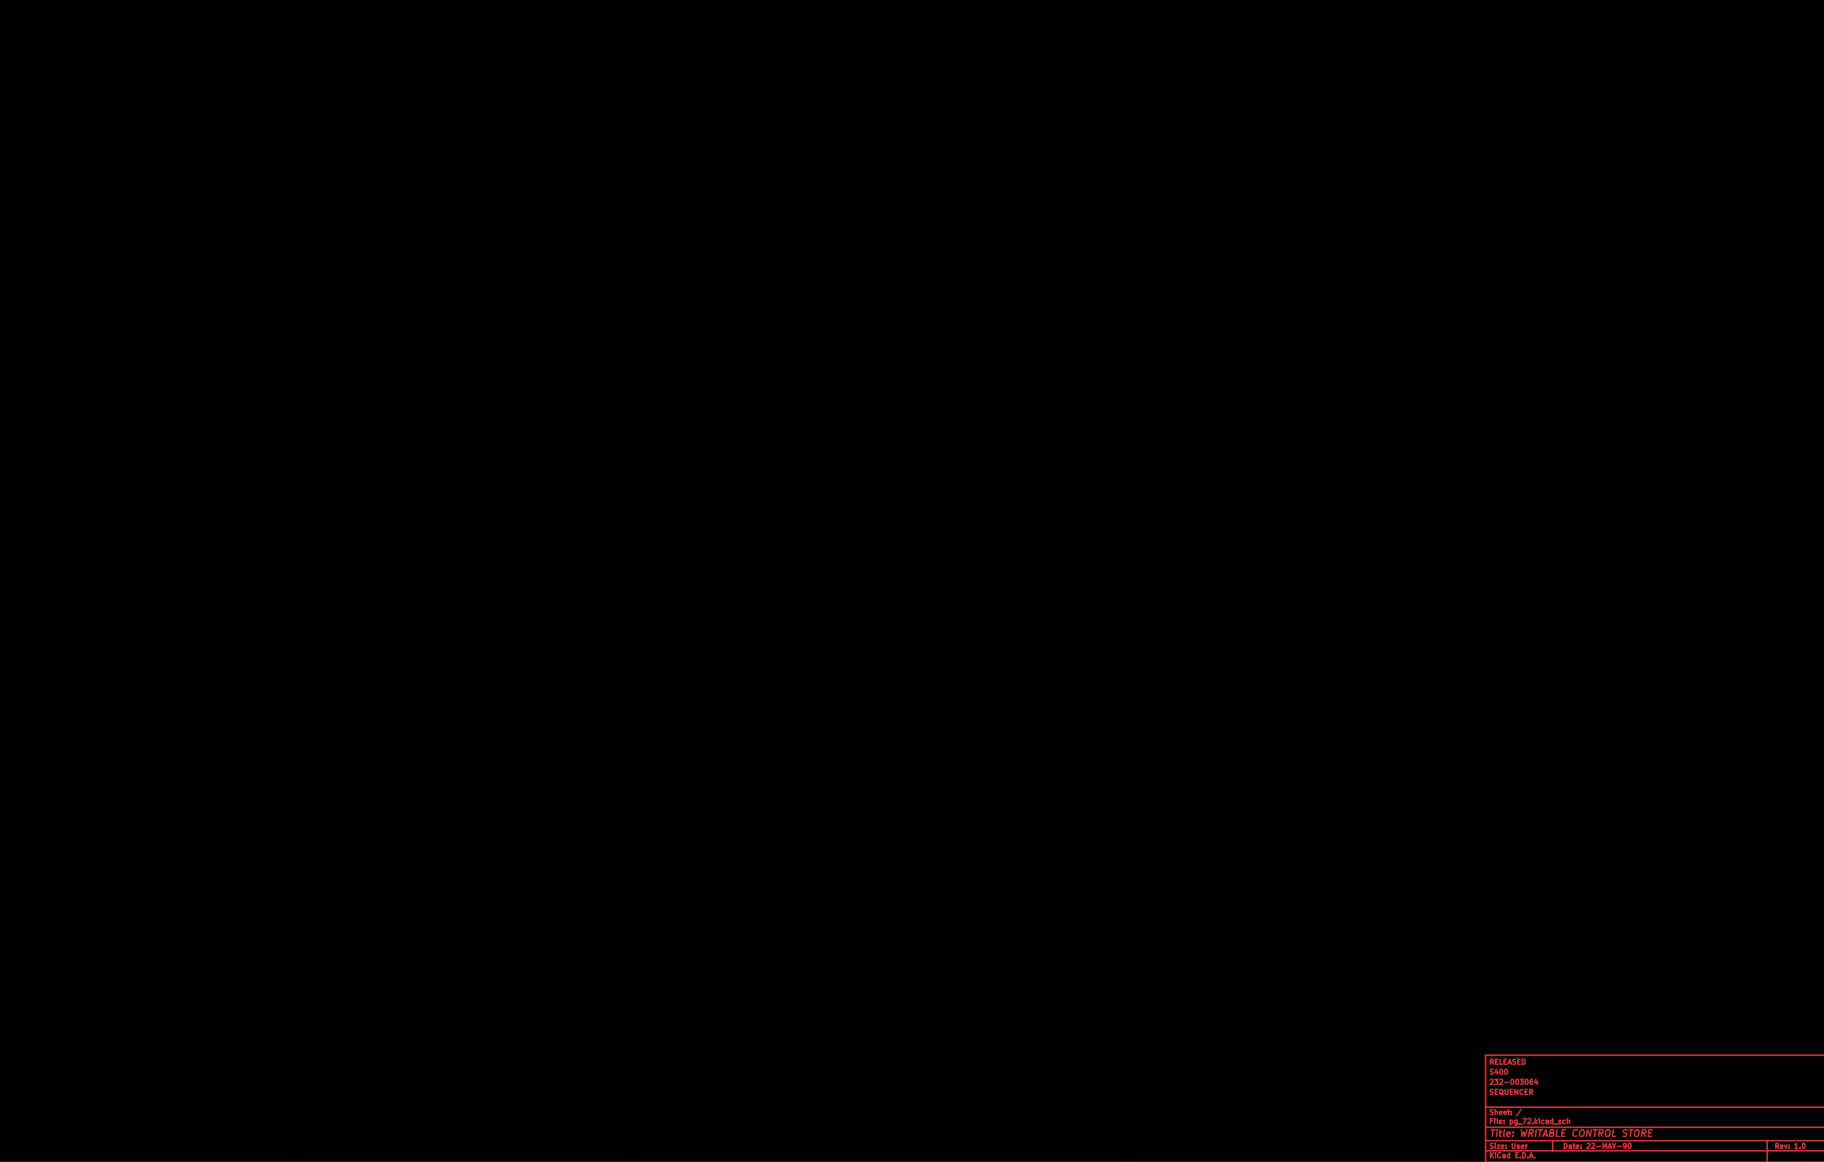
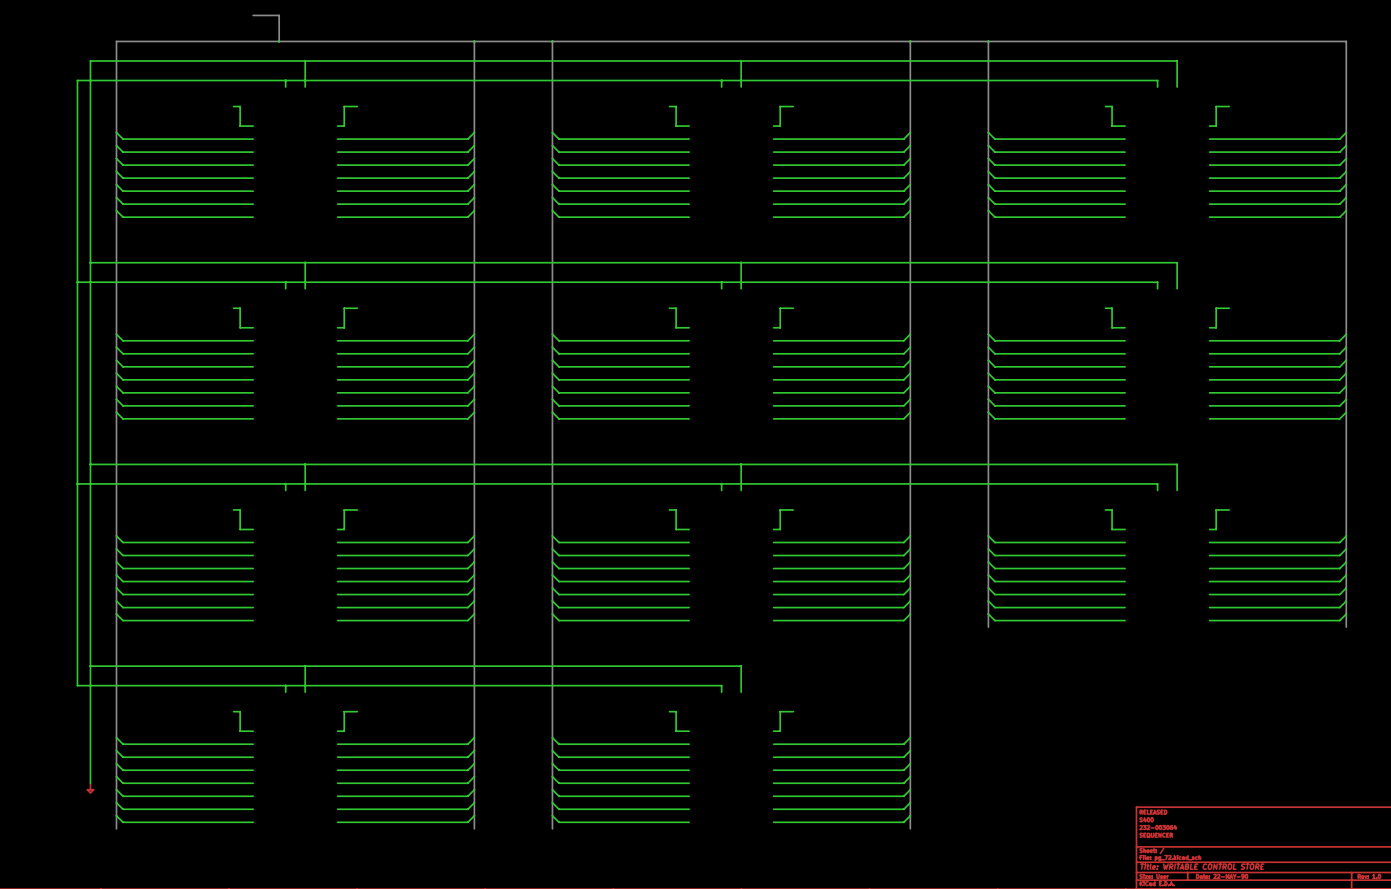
bus: none -> (253, 15) (279, 15) (279, 41)
junction: none -> (279, 41)
bus: none -> (474, 41) (474, 828)
junction: none -> (474, 41)
bus: none -> (552, 41) (552, 828)
junction: none -> (552, 41)
bus: none -> (910, 41) (910, 828)
junction: none -> (910, 41)
bus: none -> (988, 41) (988, 627)
junction: none -> (988, 41)
wire: none -> (305, 60) (305, 87)
wire: none -> (741, 60) (741, 87)
wire: none -> (285, 80) (285, 87)
wire: none -> (721, 80) (721, 87)
wire: none -> (1157, 87) (1157, 80) (77, 80) (77, 685) (721, 685) (721, 692)
wire: none -> (1177, 87) (1177, 60) (90, 60) (90, 783)
wire: none -> (233, 106) (240, 106) (240, 126) (253, 126)
wire: none -> (357, 106) (344, 106) (344, 126) (337, 126)
wire: none -> (669, 106) (676, 106) (676, 126) (689, 126)
wire: none -> (793, 106) (780, 106) (780, 126) (773, 126)
wire: none -> (1105, 106) (1112, 106) (1112, 126) (1125, 126)
wire: none -> (1229, 106) (1216, 106) (1216, 126) (1209, 126)
wire: none -> (116, 132) (123, 139) (253, 139)
wire: none -> (474, 132) (467, 139) (337, 139)
wire: none -> (552, 132) (558, 139) (689, 139)
wire: none -> (910, 132) (903, 139) (773, 139)
wire: none -> (988, 132) (994, 139) (1125, 139)
wire: none -> (1346, 132) (1339, 139) (1209, 139)
wire: none -> (116, 145) (123, 152) (253, 152)
wire: none -> (474, 145) (467, 152) (337, 152)
wire: none -> (552, 145) (558, 152) (689, 152)
wire: none -> (910, 145) (903, 152) (773, 152)
wire: none -> (988, 145) (994, 152) (1125, 152)
wire: none -> (1346, 145) (1339, 152) (1209, 152)
wire: none -> (116, 158) (123, 165) (253, 165)
wire: none -> (474, 158) (467, 165) (337, 165)
wire: none -> (552, 158) (558, 165) (689, 165)
wire: none -> (910, 158) (903, 165) (773, 165)
wire: none -> (988, 158) (994, 165) (1125, 165)
wire: none -> (1346, 158) (1339, 165) (1209, 165)
wire: none -> (116, 171) (123, 178) (253, 178)
wire: none -> (474, 171) (467, 178) (337, 178)
wire: none -> (552, 171) (558, 178) (689, 178)
wire: none -> (910, 171) (903, 178) (773, 178)
wire: none -> (988, 171) (994, 178) (1125, 178)
wire: none -> (1346, 171) (1339, 178) (1209, 178)
wire: none -> (116, 184) (123, 191) (253, 191)
wire: none -> (474, 184) (467, 191) (337, 191)
wire: none -> (552, 184) (558, 191) (689, 191)
wire: none -> (910, 184) (903, 191) (773, 191)
wire: none -> (988, 184) (994, 191) (1125, 191)
wire: none -> (1346, 184) (1339, 191) (1209, 191)
wire: none -> (116, 197) (123, 204) (253, 204)
wire: none -> (474, 197) (467, 204) (337, 204)
wire: none -> (552, 197) (558, 204) (689, 204)
wire: none -> (910, 197) (903, 204) (773, 204)
wire: none -> (988, 197) (994, 204) (1125, 204)
wire: none -> (1346, 197) (1339, 204) (1209, 204)
wire: none -> (116, 210) (123, 217) (253, 217)
wire: none -> (474, 210) (467, 217) (337, 217)
wire: none -> (552, 210) (558, 217) (689, 217)
wire: none -> (910, 210) (903, 217) (773, 217)
wire: none -> (988, 210) (994, 217) (1125, 217)
wire: none -> (1346, 210) (1339, 217) (1209, 217)
wire: none -> (90, 262) (1177, 262) (1177, 288)
wire: none -> (305, 262) (305, 288)
wire: none -> (741, 262) (741, 288)
wire: none -> (77, 282) (1157, 282) (1157, 288)
wire: none -> (285, 282) (285, 288)
wire: none -> (721, 282) (721, 288)
wire: none -> (233, 308) (240, 308) (240, 327) (253, 327)
wire: none -> (357, 308) (344, 308) (344, 327) (337, 327)
wire: none -> (669, 308) (676, 308) (676, 327) (689, 327)
wire: none -> (793, 308) (780, 308) (780, 327) (773, 327)
wire: none -> (1105, 308) (1112, 308) (1112, 327) (1125, 327)
wire: none -> (1229, 308) (1216, 308) (1216, 327) (1209, 327)
wire: none -> (116, 334) (123, 340) (253, 340)
wire: none -> (474, 334) (467, 340) (337, 340)
wire: none -> (552, 334) (558, 340) (689, 340)
wire: none -> (910, 334) (903, 340) (773, 340)
wire: none -> (988, 334) (994, 340) (1125, 340)
wire: none -> (1346, 334) (1339, 340) (1209, 340)
wire: none -> (116, 347) (123, 353) (253, 353)
wire: none -> (474, 347) (467, 353) (337, 353)
wire: none -> (552, 347) (558, 353) (689, 353)
wire: none -> (910, 347) (903, 353) (773, 353)
wire: none -> (988, 347) (994, 353) (1125, 353)
wire: none -> (1346, 347) (1339, 353) (1209, 353)
wire: none -> (116, 360) (123, 366) (253, 366)
wire: none -> (474, 360) (467, 366) (337, 366)
wire: none -> (552, 360) (558, 366) (689, 366)
wire: none -> (910, 360) (903, 366) (773, 366)
wire: none -> (988, 360) (994, 366) (1125, 366)
wire: none -> (1346, 360) (1339, 366) (1209, 366)
wire: none -> (116, 373) (123, 379) (253, 379)
wire: none -> (474, 373) (467, 379) (337, 379)
wire: none -> (552, 373) (558, 379) (689, 379)
wire: none -> (910, 373) (903, 379) (773, 379)
wire: none -> (988, 373) (994, 379) (1125, 379)
wire: none -> (1346, 373) (1339, 379) (1209, 379)
wire: none -> (116, 386) (123, 392) (253, 392)
wire: none -> (474, 386) (467, 392) (337, 392)
wire: none -> (552, 386) (558, 392) (689, 392)
wire: none -> (910, 386) (903, 392) (773, 392)
wire: none -> (988, 386) (994, 392) (1125, 392)
wire: none -> (1346, 386) (1339, 392) (1209, 392)
wire: none -> (116, 399) (123, 405) (253, 405)
wire: none -> (474, 399) (467, 405) (337, 405)
wire: none -> (552, 399) (558, 405) (689, 405)
wire: none -> (910, 399) (903, 405) (773, 405)
wire: none -> (988, 399) (994, 405) (1125, 405)
wire: none -> (1346, 399) (1339, 405) (1209, 405)
wire: none -> (116, 412) (123, 418) (253, 418)
wire: none -> (474, 412) (467, 418) (337, 418)
wire: none -> (552, 412) (558, 418) (689, 418)
wire: none -> (910, 412) (903, 418) (773, 418)
wire: none -> (988, 412) (994, 418) (1125, 418)
wire: none -> (1346, 412) (1339, 418) (1209, 418)
wire: none -> (90, 464) (1177, 464) (1177, 490)
wire: none -> (305, 464) (305, 490)
wire: none -> (741, 464) (741, 490)
wire: none -> (77, 483) (1157, 483) (1157, 490)
wire: none -> (285, 483) (285, 490)
wire: none -> (721, 483) (721, 490)
wire: none -> (233, 509) (240, 509) (240, 529) (253, 529)
wire: none -> (357, 509) (344, 509) (344, 529) (337, 529)
wire: none -> (669, 509) (676, 509) (676, 529) (689, 529)
wire: none -> (793, 509) (780, 509) (780, 529) (773, 529)
wire: none -> (1105, 509) (1112, 509) (1112, 529) (1125, 529)
wire: none -> (1229, 509) (1216, 509) (1216, 529) (1209, 529)
wire: none -> (116, 535) (123, 542) (253, 542)
wire: none -> (474, 535) (467, 542) (337, 542)
wire: none -> (552, 535) (558, 542) (689, 542)
wire: none -> (910, 535) (903, 542) (773, 542)
wire: none -> (988, 535) (994, 542) (1125, 542)
wire: none -> (1346, 535) (1339, 542) (1209, 542)
wire: none -> (116, 549) (123, 555) (253, 555)
wire: none -> (474, 549) (467, 555) (337, 555)
wire: none -> (552, 549) (558, 555) (689, 555)
wire: none -> (910, 549) (903, 555) (773, 555)
wire: none -> (988, 549) (994, 555) (1125, 555)
wire: none -> (1346, 549) (1339, 555) (1209, 555)
wire: none -> (116, 562) (123, 568) (253, 568)
wire: none -> (474, 562) (467, 568) (337, 568)
wire: none -> (552, 562) (558, 568) (689, 568)
wire: none -> (910, 562) (903, 568) (773, 568)
wire: none -> (988, 562) (994, 568) (1125, 568)
wire: none -> (1346, 562) (1339, 568) (1209, 568)
wire: none -> (116, 575) (123, 581) (253, 581)
wire: none -> (474, 575) (467, 581) (337, 581)
wire: none -> (552, 575) (558, 581) (689, 581)
wire: none -> (910, 575) (903, 581) (773, 581)
wire: none -> (988, 575) (994, 581) (1125, 581)
wire: none -> (1346, 575) (1339, 581) (1209, 581)
wire: none -> (116, 588) (123, 594) (253, 594)
wire: none -> (474, 588) (467, 594) (337, 594)
wire: none -> (552, 588) (558, 594) (689, 594)
wire: none -> (910, 588) (903, 594) (773, 594)
wire: none -> (988, 588) (994, 594) (1125, 594)
wire: none -> (1346, 588) (1339, 594) (1209, 594)
wire: none -> (116, 601) (123, 607) (253, 607)
wire: none -> (474, 601) (467, 607) (337, 607)
wire: none -> (552, 601) (558, 607) (689, 607)
wire: none -> (910, 601) (903, 607) (773, 607)
wire: none -> (988, 601) (994, 607) (1125, 607)
wire: none -> (1346, 601) (1339, 607) (1209, 607)
wire: none -> (116, 614) (123, 620) (253, 620)
wire: none -> (474, 614) (467, 620) (337, 620)
wire: none -> (552, 614) (558, 620) (689, 620)
wire: none -> (910, 614) (903, 620) (773, 620)
wire: none -> (988, 614) (994, 620) (1125, 620)
wire: none -> (1346, 614) (1339, 620) (1209, 620)
bus: none -> (1346, 627) (1346, 41) (116, 41) (116, 828)
wire: none -> (90, 666) (741, 666) (741, 692)
wire: none -> (305, 666) (305, 692)
wire: none -> (285, 685) (285, 692)
wire: none -> (233, 711) (240, 711) (240, 731) (253, 731)
wire: none -> (357, 711) (344, 711) (344, 731) (337, 731)
wire: none -> (669, 711) (676, 711) (676, 731) (689, 731)
wire: none -> (793, 711) (780, 711) (780, 731) (773, 731)
wire: none -> (116, 737) (123, 744) (253, 744)
wire: none -> (474, 737) (467, 744) (337, 744)
wire: none -> (552, 737) (558, 744) (689, 744)
wire: none -> (910, 737) (903, 744) (773, 744)
wire: none -> (116, 750) (123, 757) (253, 757)
wire: none -> (474, 750) (467, 757) (337, 757)
wire: none -> (552, 750) (558, 757) (689, 757)
wire: none -> (910, 750) (903, 757) (773, 757)
wire: none -> (116, 763) (123, 770) (253, 770)
wire: none -> (474, 763) (467, 770) (337, 770)
wire: none -> (552, 763) (558, 770) (689, 770)
wire: none -> (910, 763) (903, 770) (773, 770)
wire: none -> (116, 776) (123, 783) (253, 783)
wire: none -> (474, 776) (467, 783) (337, 783)
wire: none -> (552, 776) (558, 783) (689, 783)
wire: none -> (910, 776) (903, 783) (773, 783)
power symbol: none -> (90, 788)
wire: none -> (116, 789) (123, 796) (253, 796)
wire: none -> (474, 789) (467, 796) (337, 796)
wire: none -> (552, 789) (558, 796) (689, 796)
wire: none -> (910, 789) (903, 796) (773, 796)
wire: none -> (116, 802) (123, 809) (253, 809)
wire: none -> (474, 802) (467, 809) (337, 809)
wire: none -> (552, 802) (558, 809) (689, 809)
wire: none -> (910, 802) (903, 809) (773, 809)
wire: none -> (116, 815) (123, 822) (253, 822)
wire: none -> (474, 815) (467, 822) (337, 822)
wire: none -> (552, 815) (558, 822) (689, 822)
wire: none -> (910, 815) (903, 822) (773, 822)

